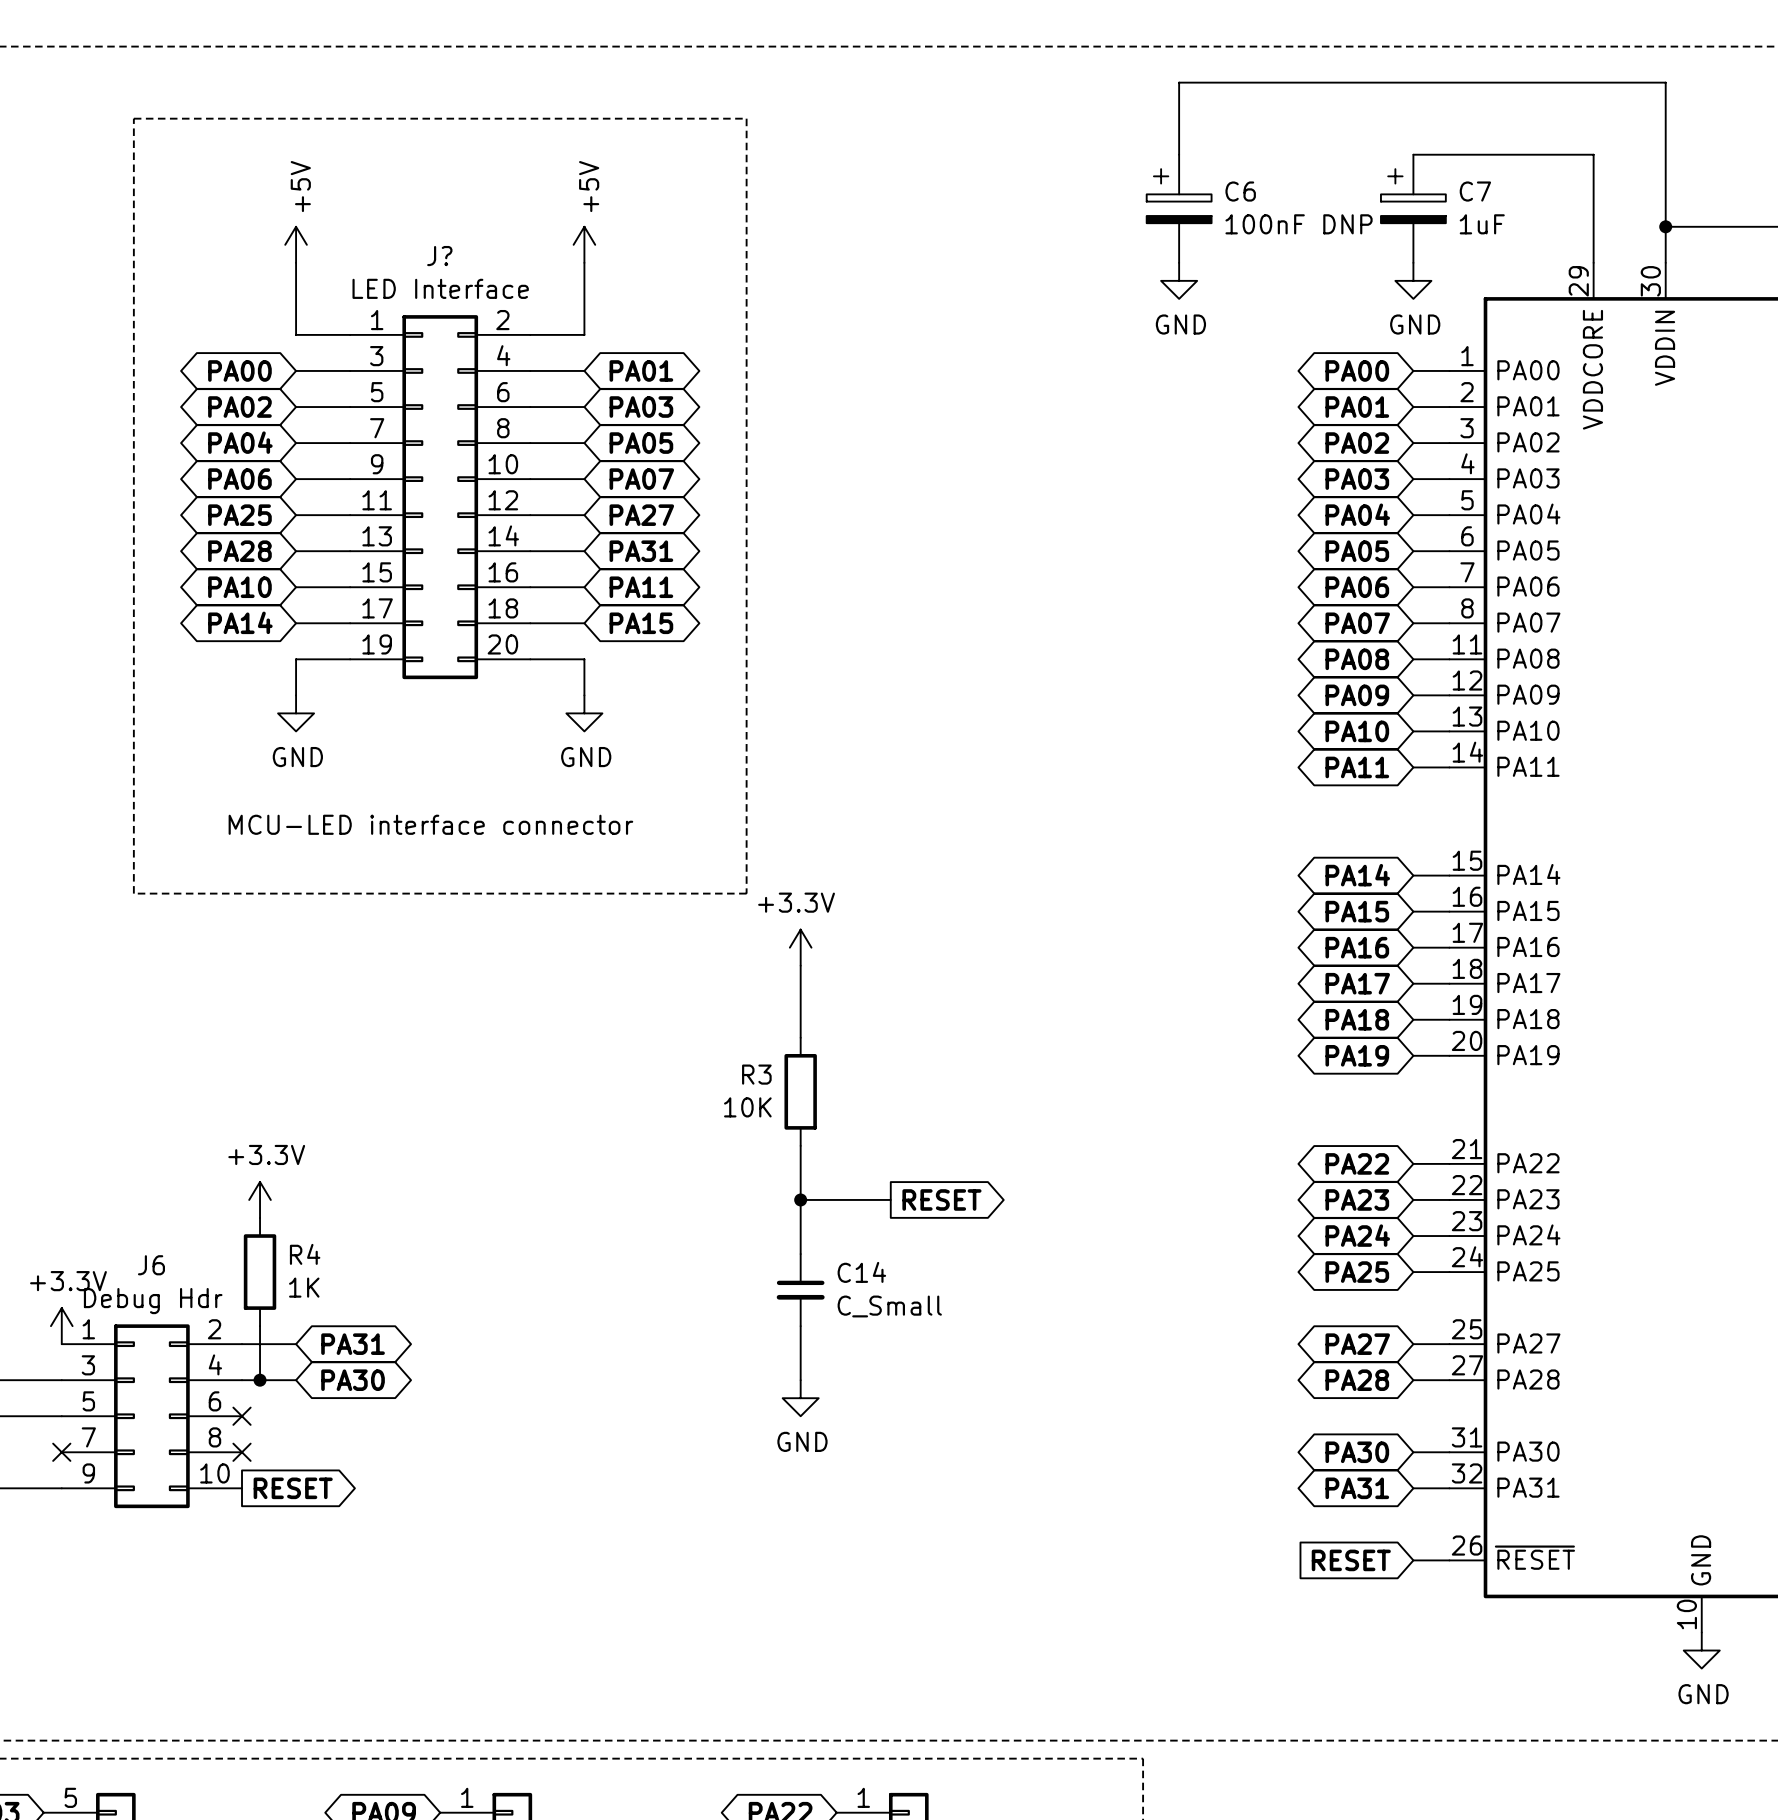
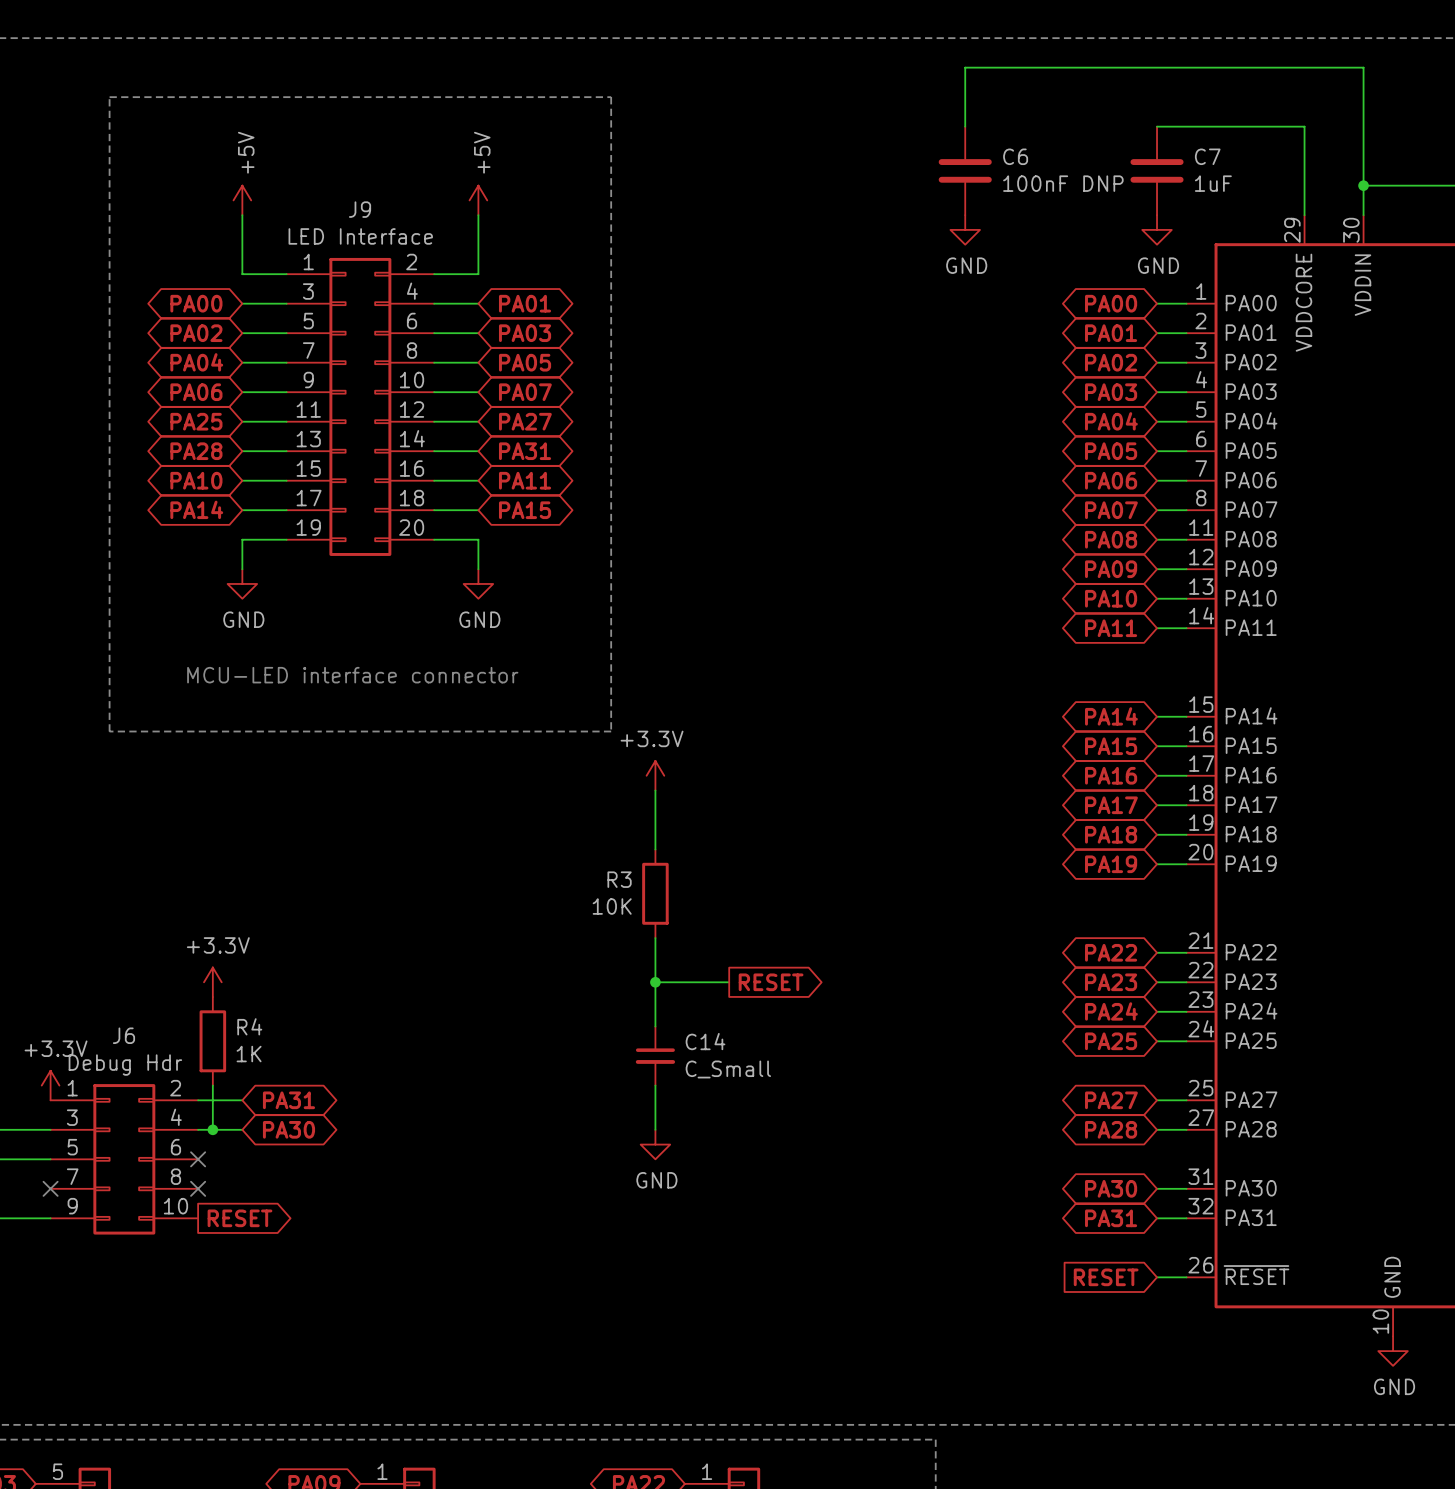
C6 symbol: [1146, 154, 1212, 263] -> [938, 126, 992, 216]
C7 symbol: [1380, 154, 1446, 263] -> [1130, 126, 1184, 216]
J? name: J? (439, 256) -> J9 (360, 209)

